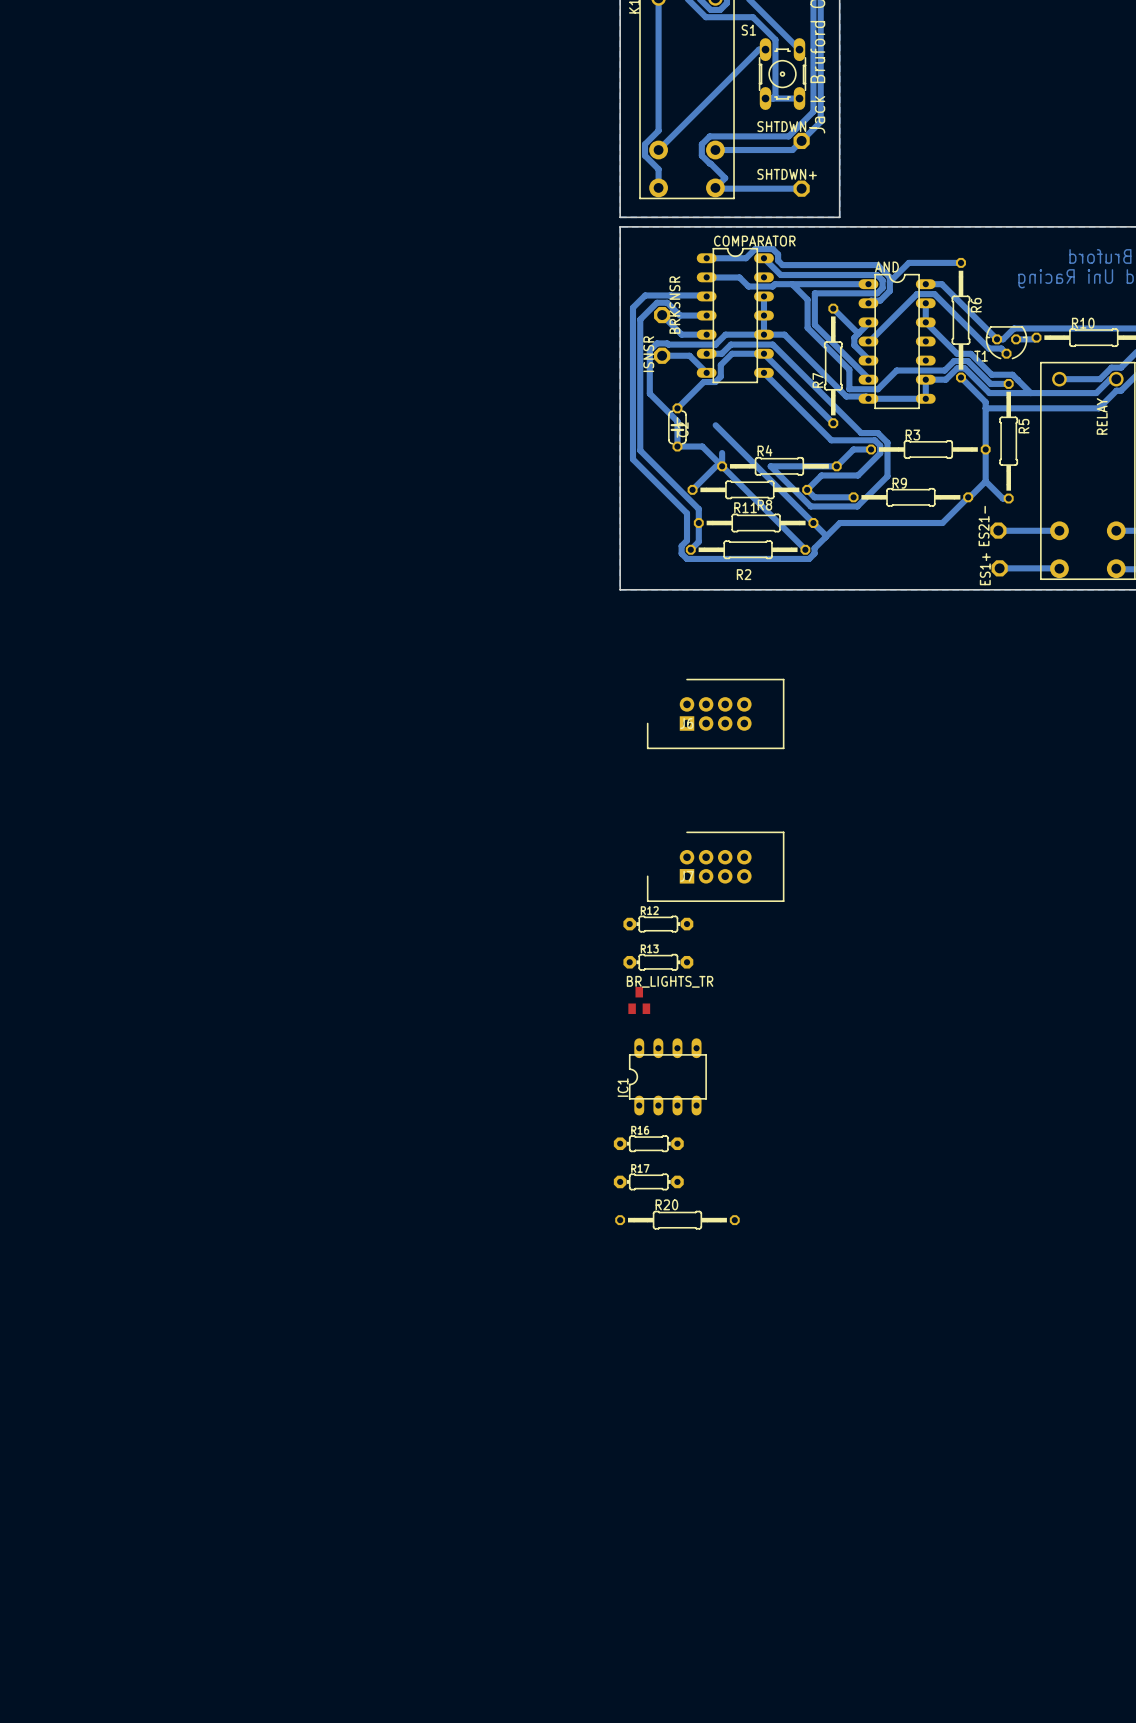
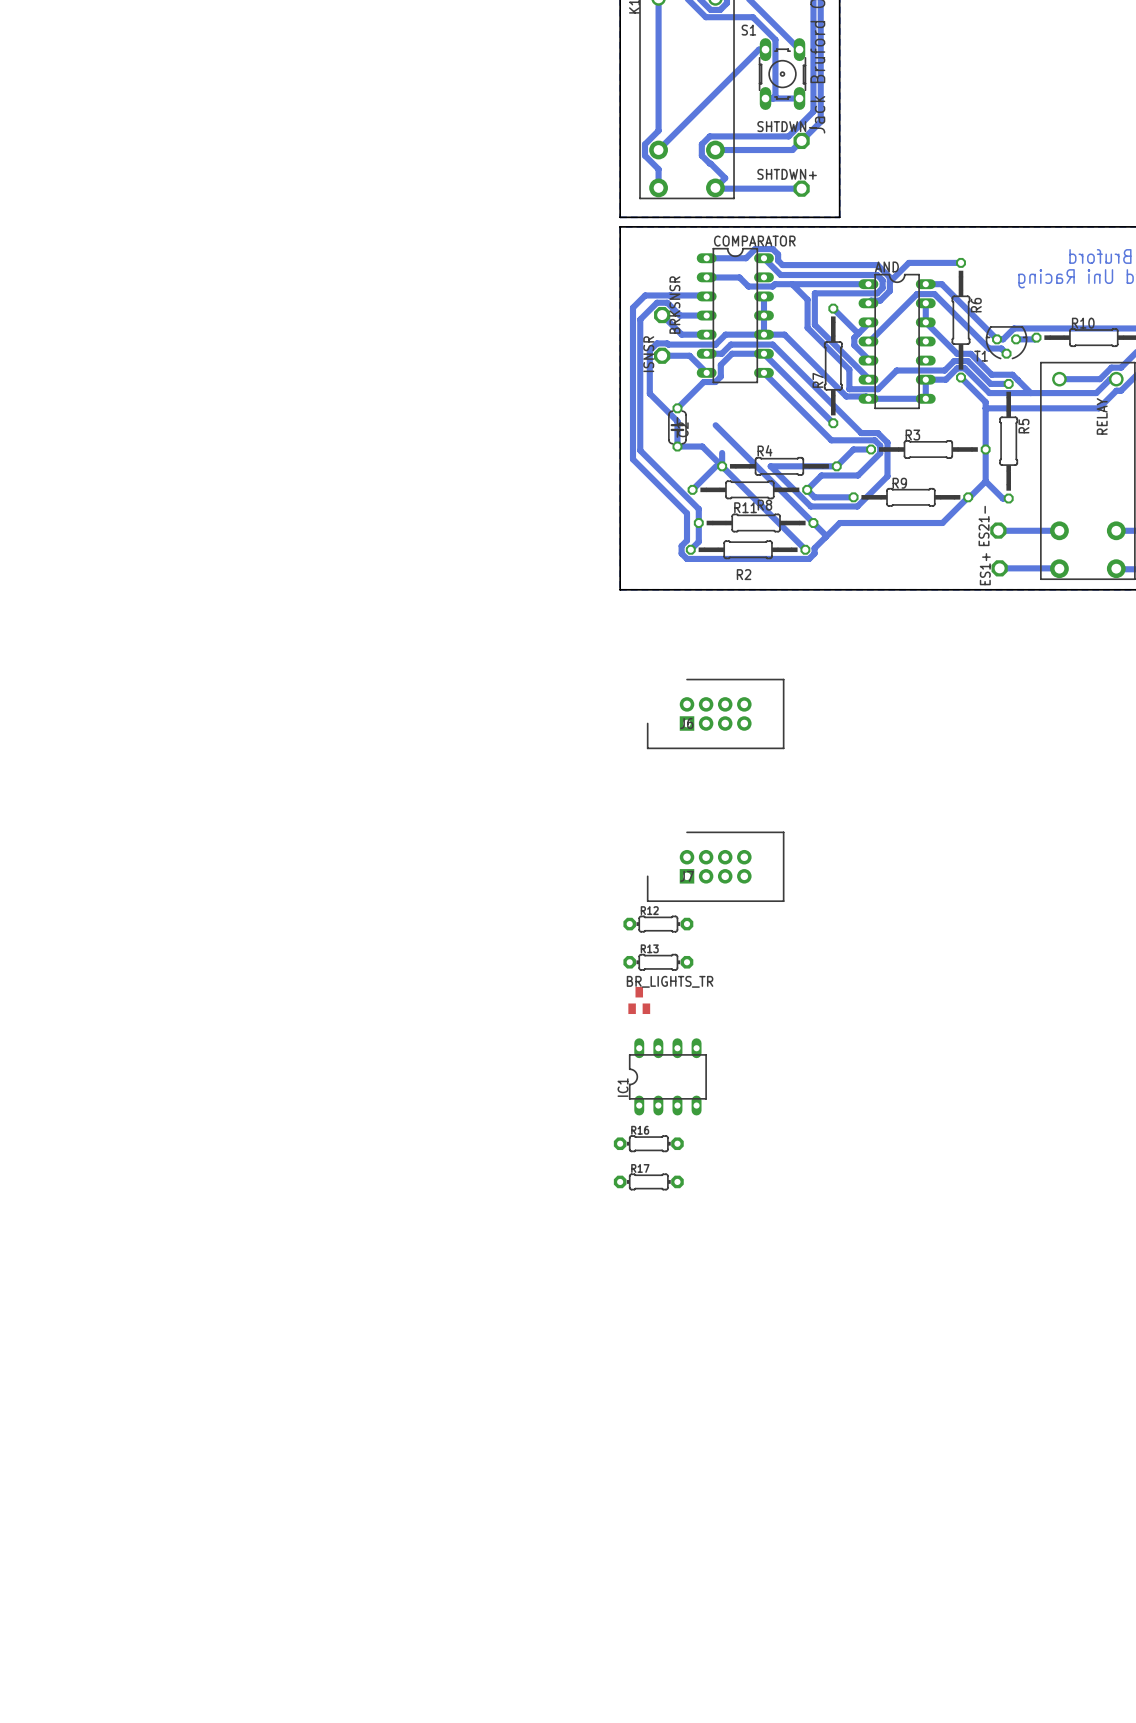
R20: (677, 1220) -> none

